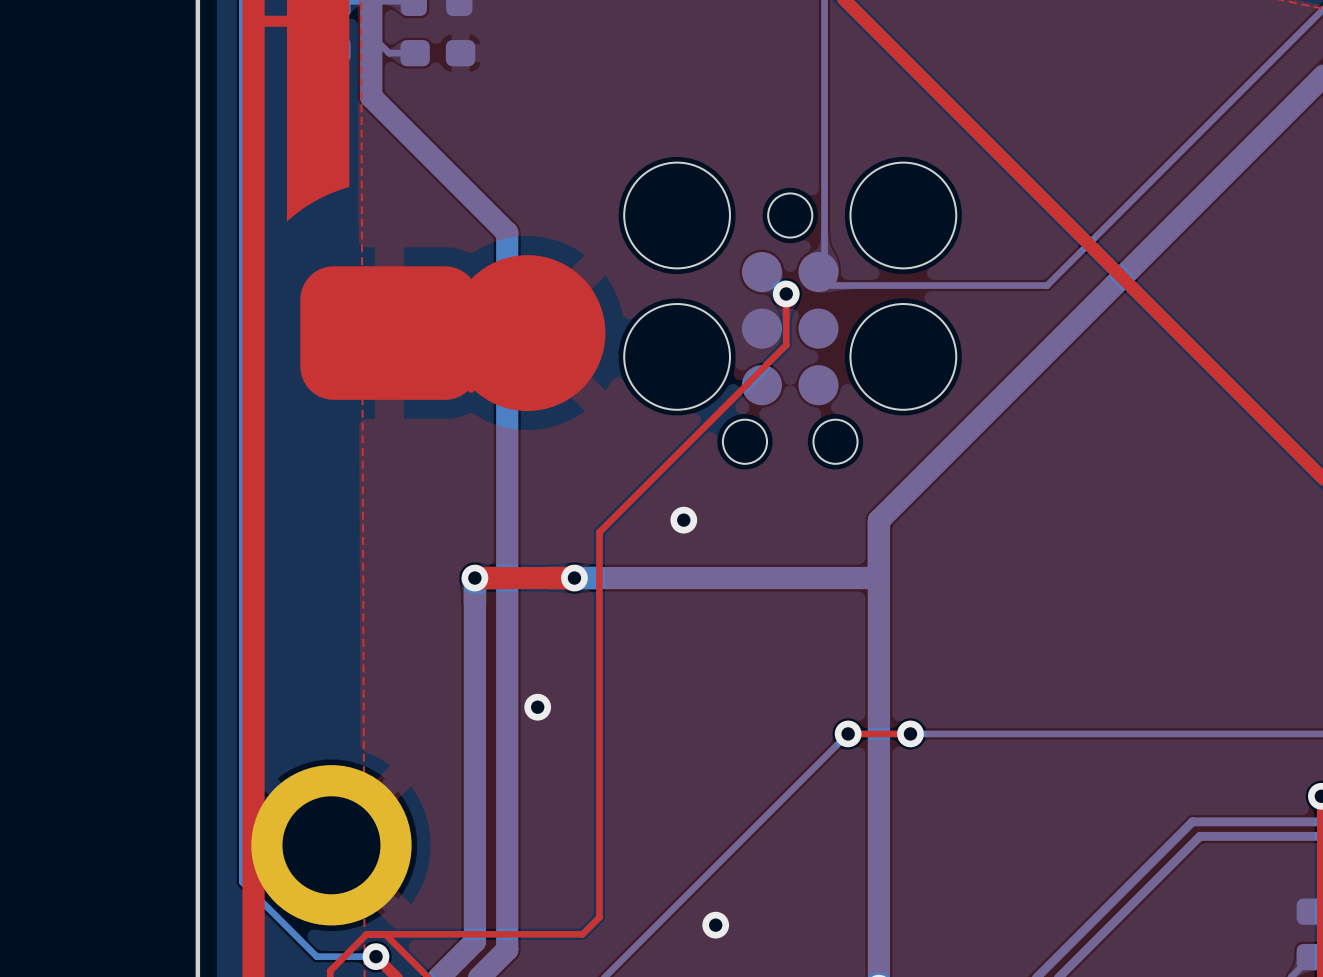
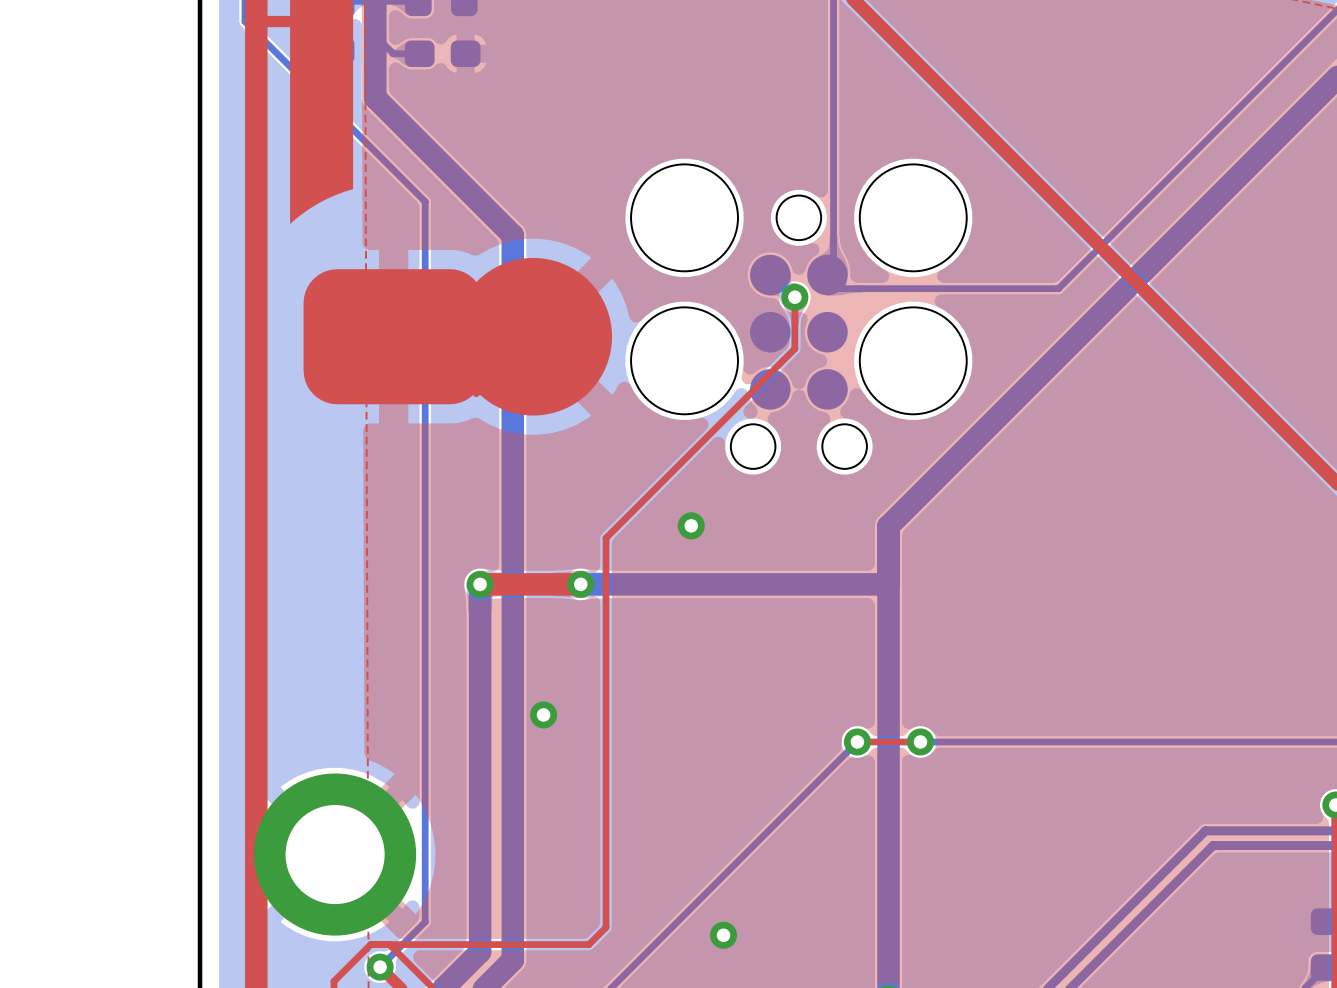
bottom track: (242, 21) (242, 882) (316, 956) (376, 956) -> (245, 21) (425, 201) (425, 922) (380, 967)

